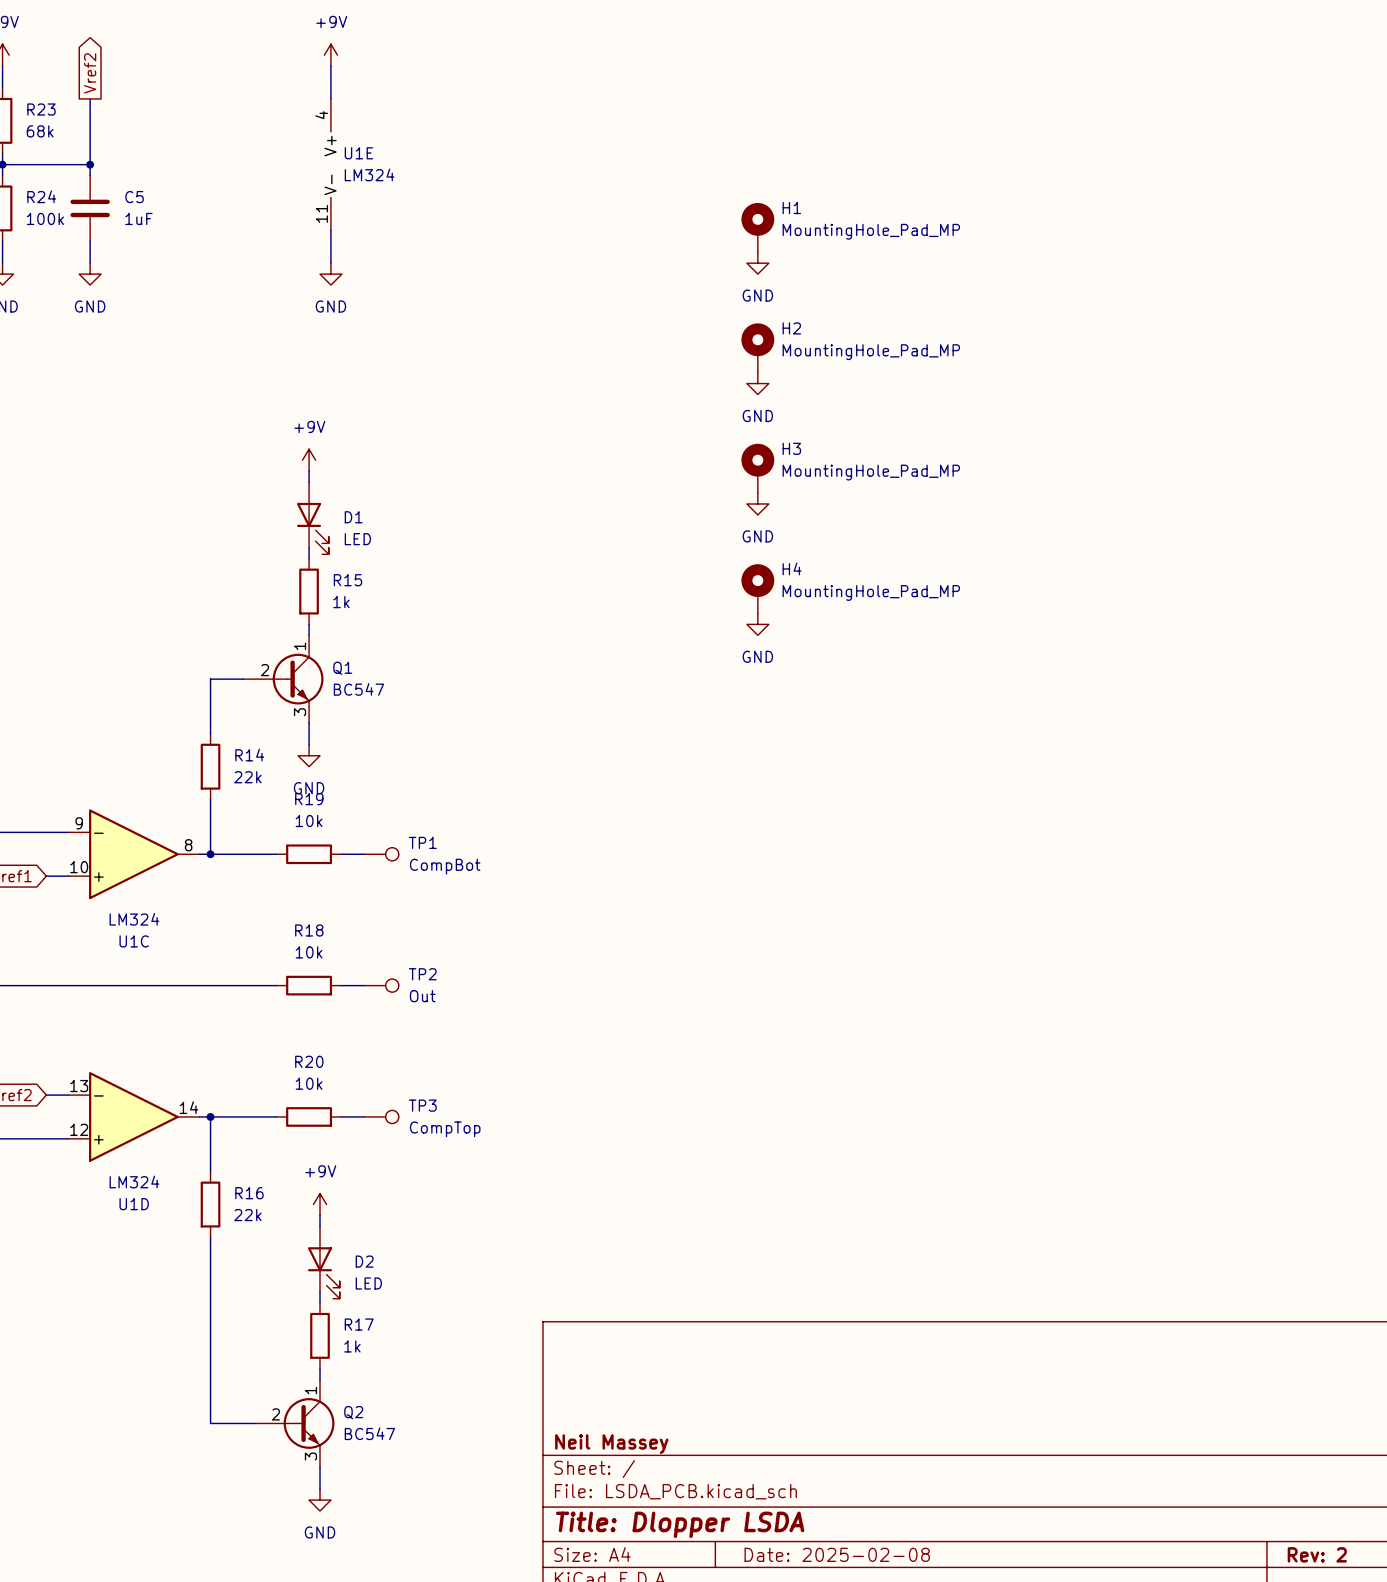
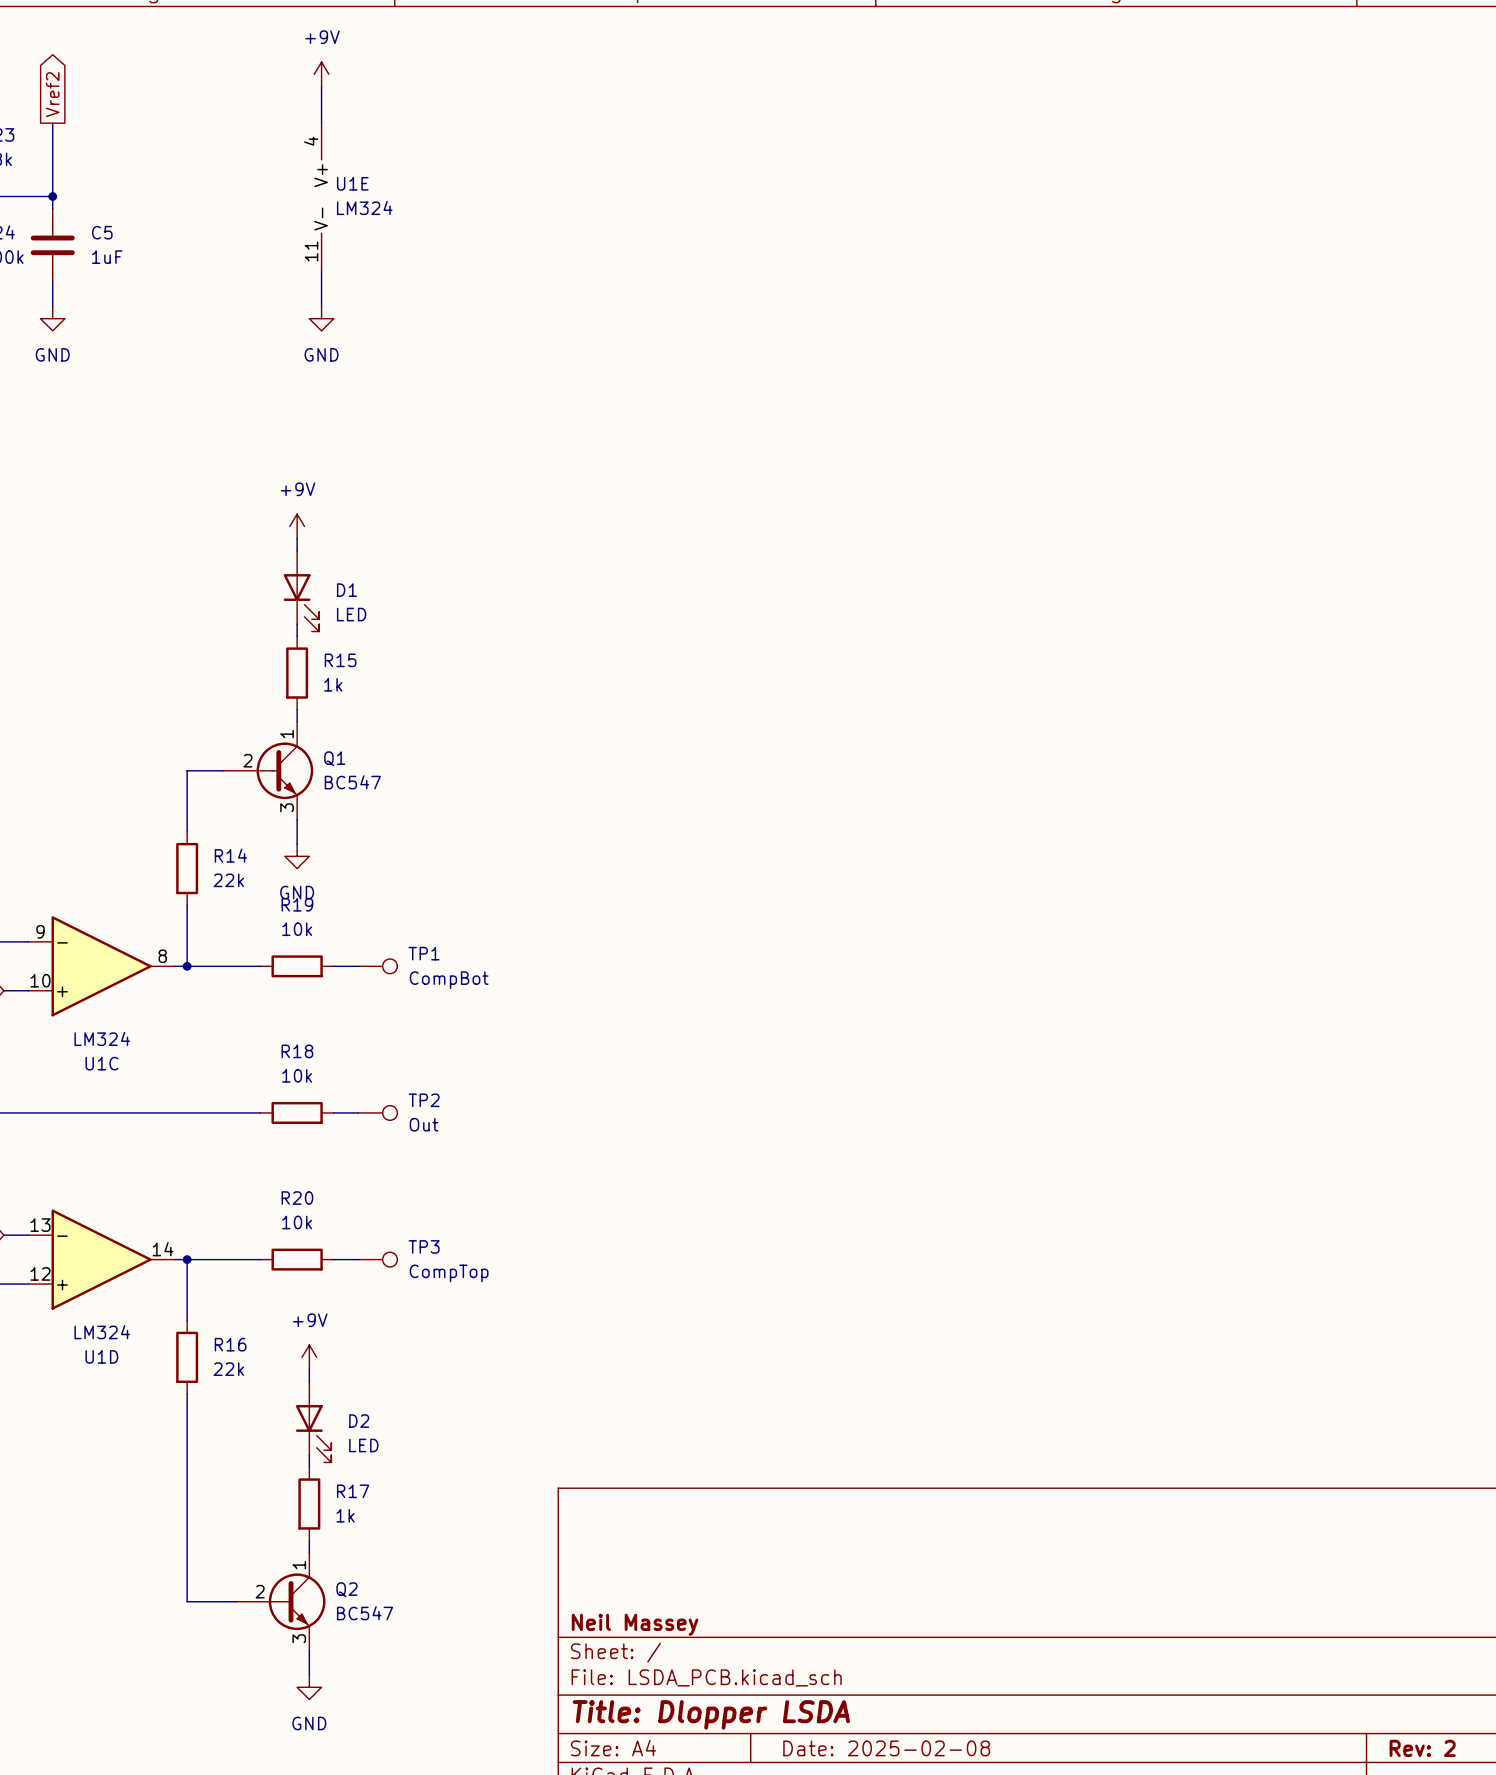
H1: MountingHole_Pad_MP (757, 227) -> none
power symbol: GND (757, 263) -> none
H2: MountingHole_Pad_MP (757, 348) -> none
power symbol: GND (757, 383) -> none
H3: MountingHole_Pad_MP (757, 468) -> none
power symbol: GND (757, 503) -> none
H4: MountingHole_Pad_MP (757, 588) -> none
power symbol: GND (757, 624) -> none

